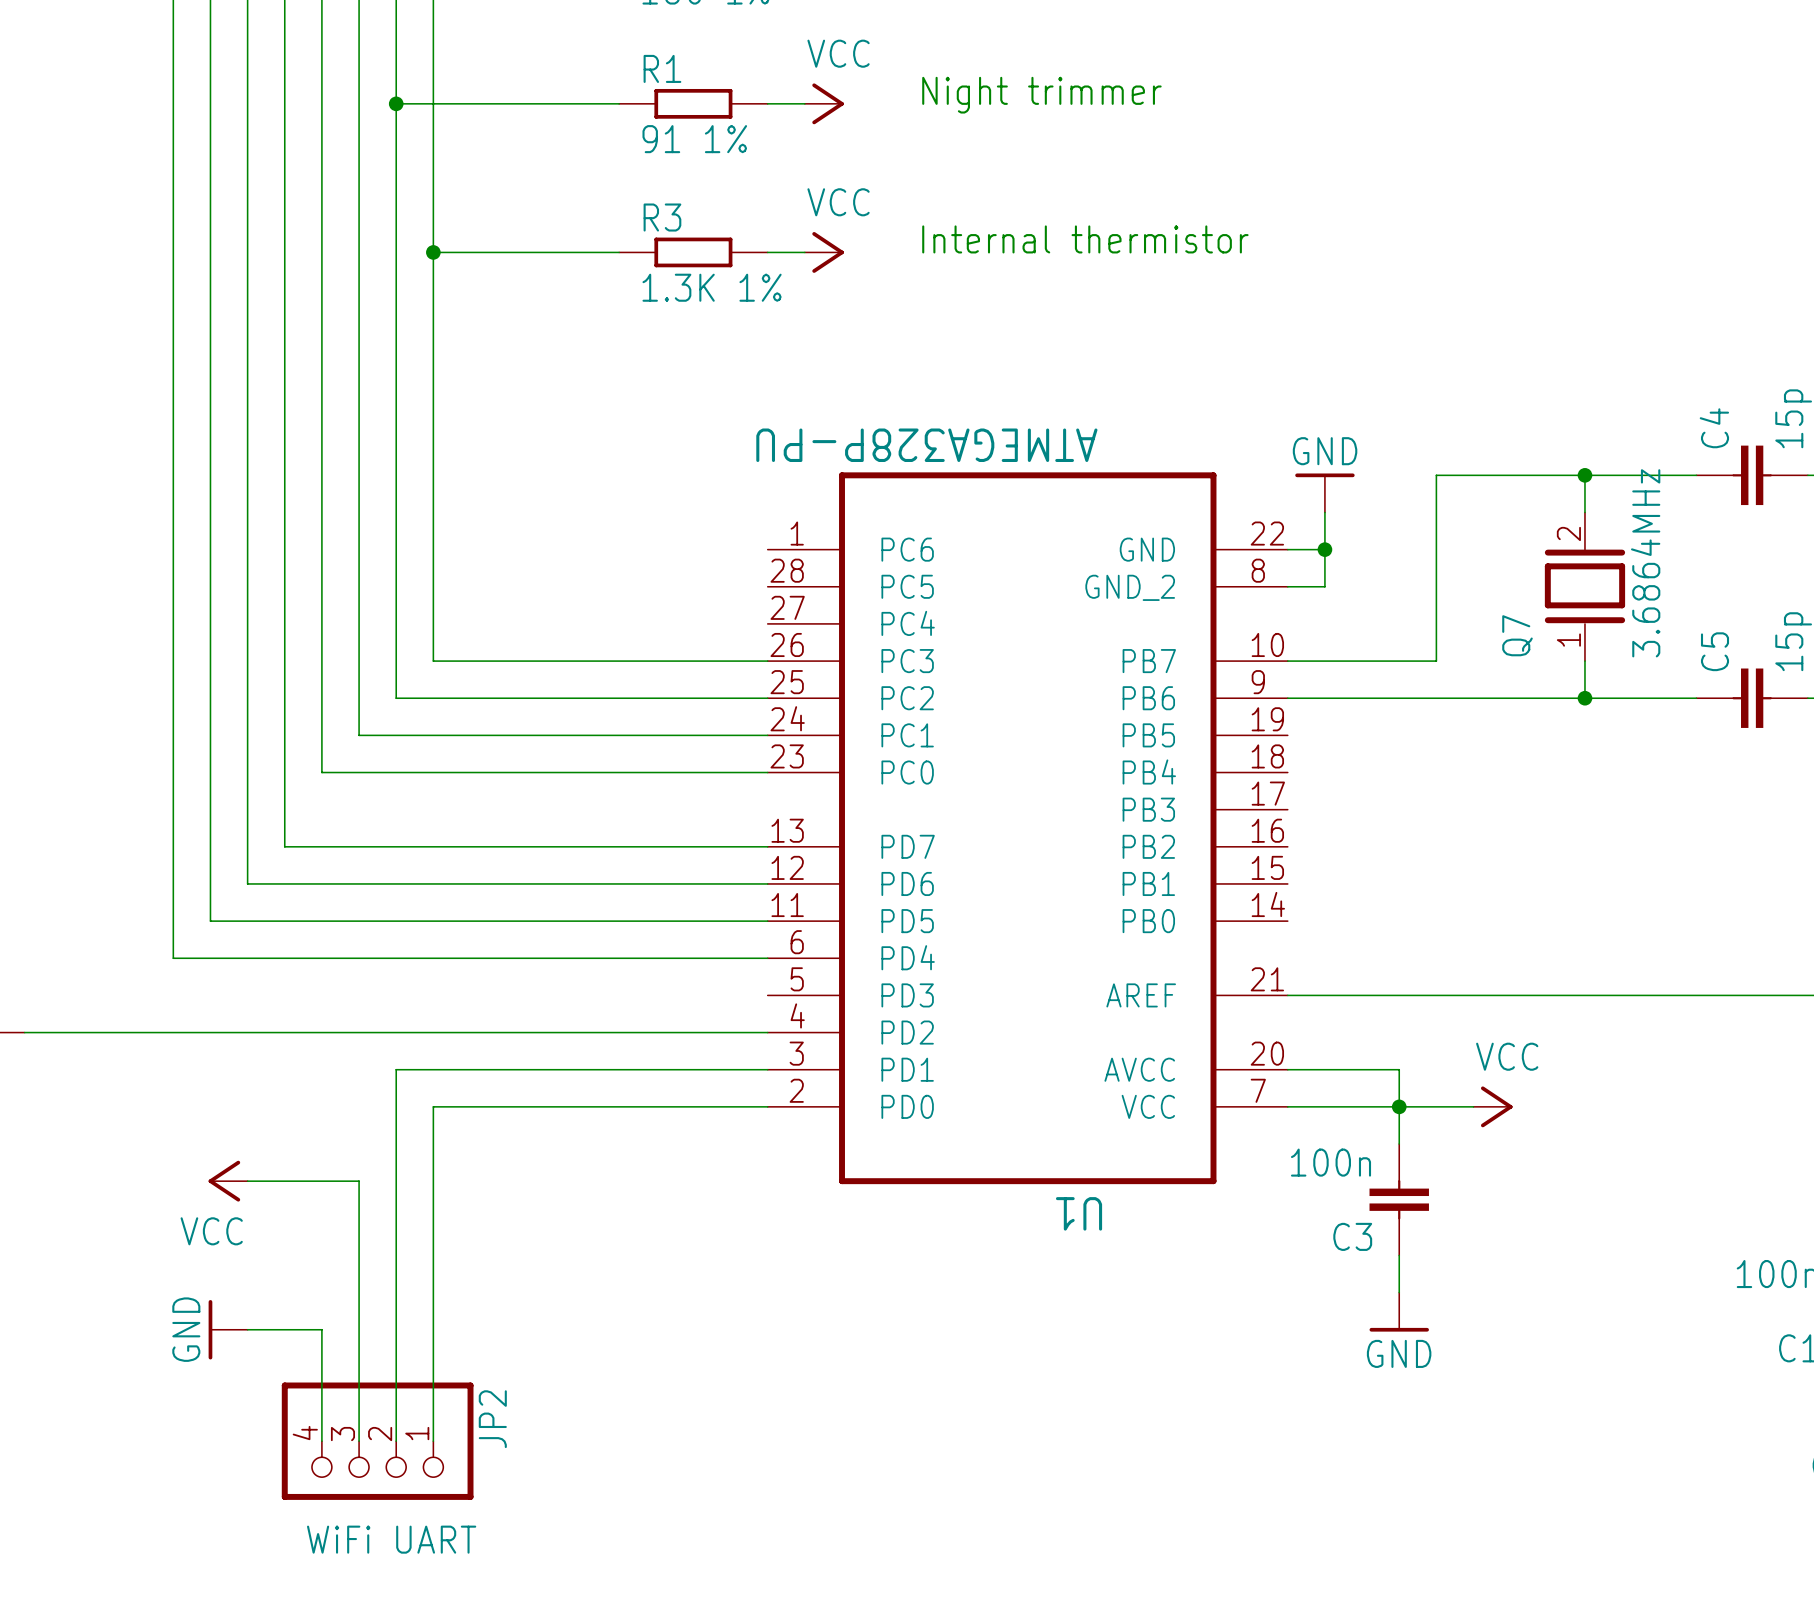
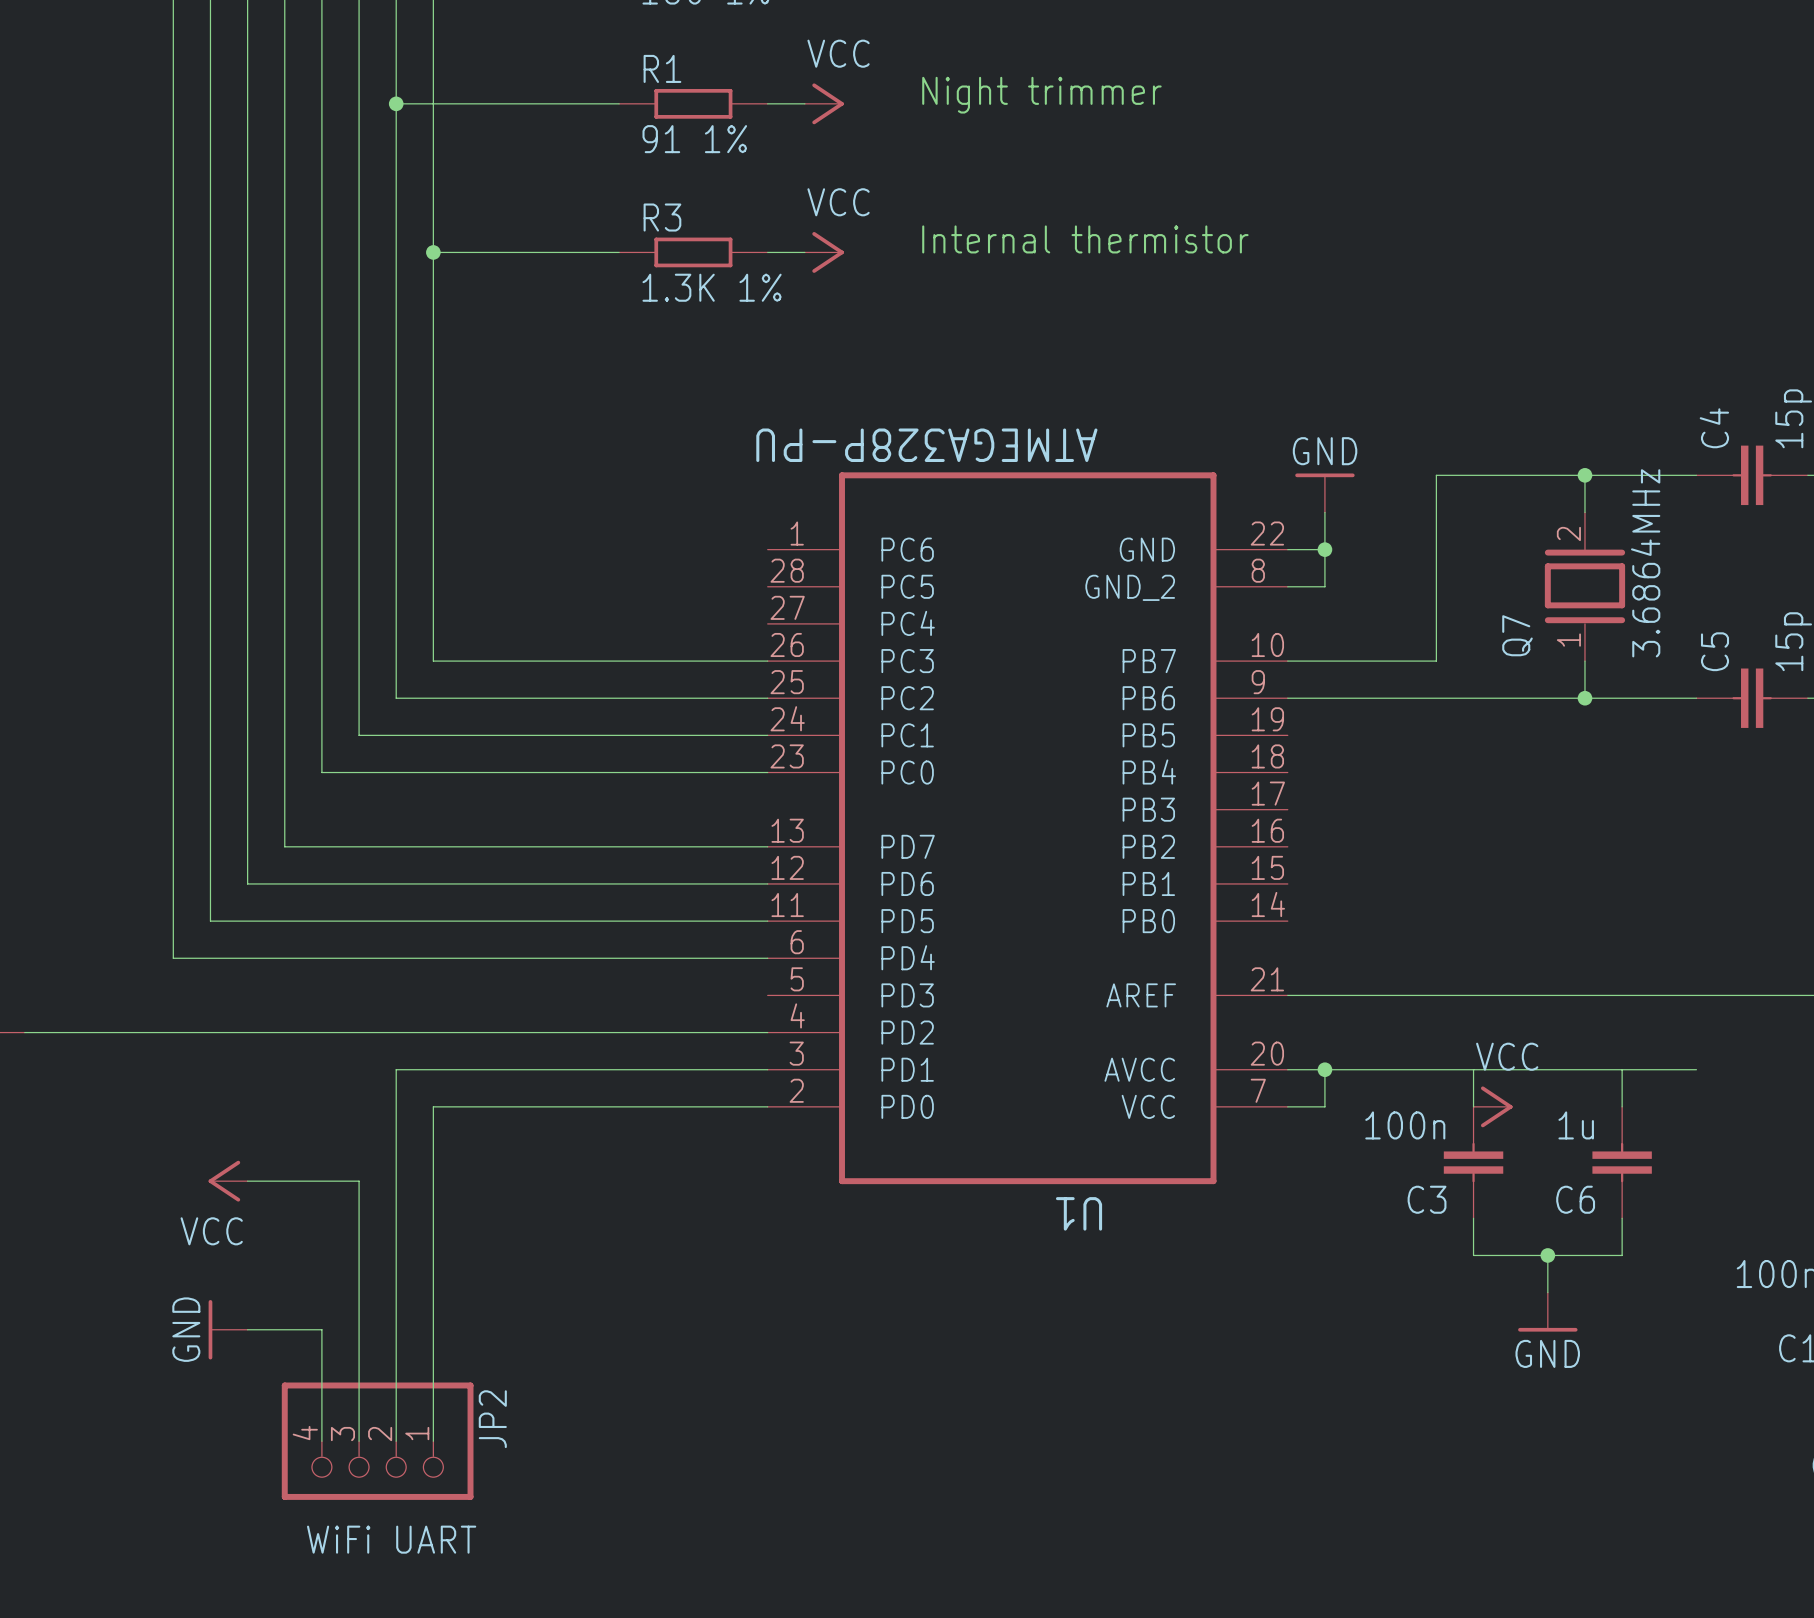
wire: (1399, 1069) (1399, 1144) -> (1399, 1069) (1696, 1069)
wire: none -> (1473, 1069) (1473, 1106)
wire: none -> (1622, 1069) (1622, 1106)
wire: (1324, 1106) (1473, 1106) -> (1324, 1106) (1324, 1069)
junction position: (1399, 1106) -> (1324, 1069)
C6: none -> 1u (1622, 1162)
C3 position: (1399, 1199) -> (1473, 1162)
wire: none -> (1473, 1218) (1473, 1255) (1622, 1255) (1622, 1218)
wire: (1399, 1255) (1399, 1292) -> (1547, 1255) (1547, 1292)
junction: none -> (1547, 1255)
power symbol position: GND (1399, 1312) -> GND (1547, 1312)

